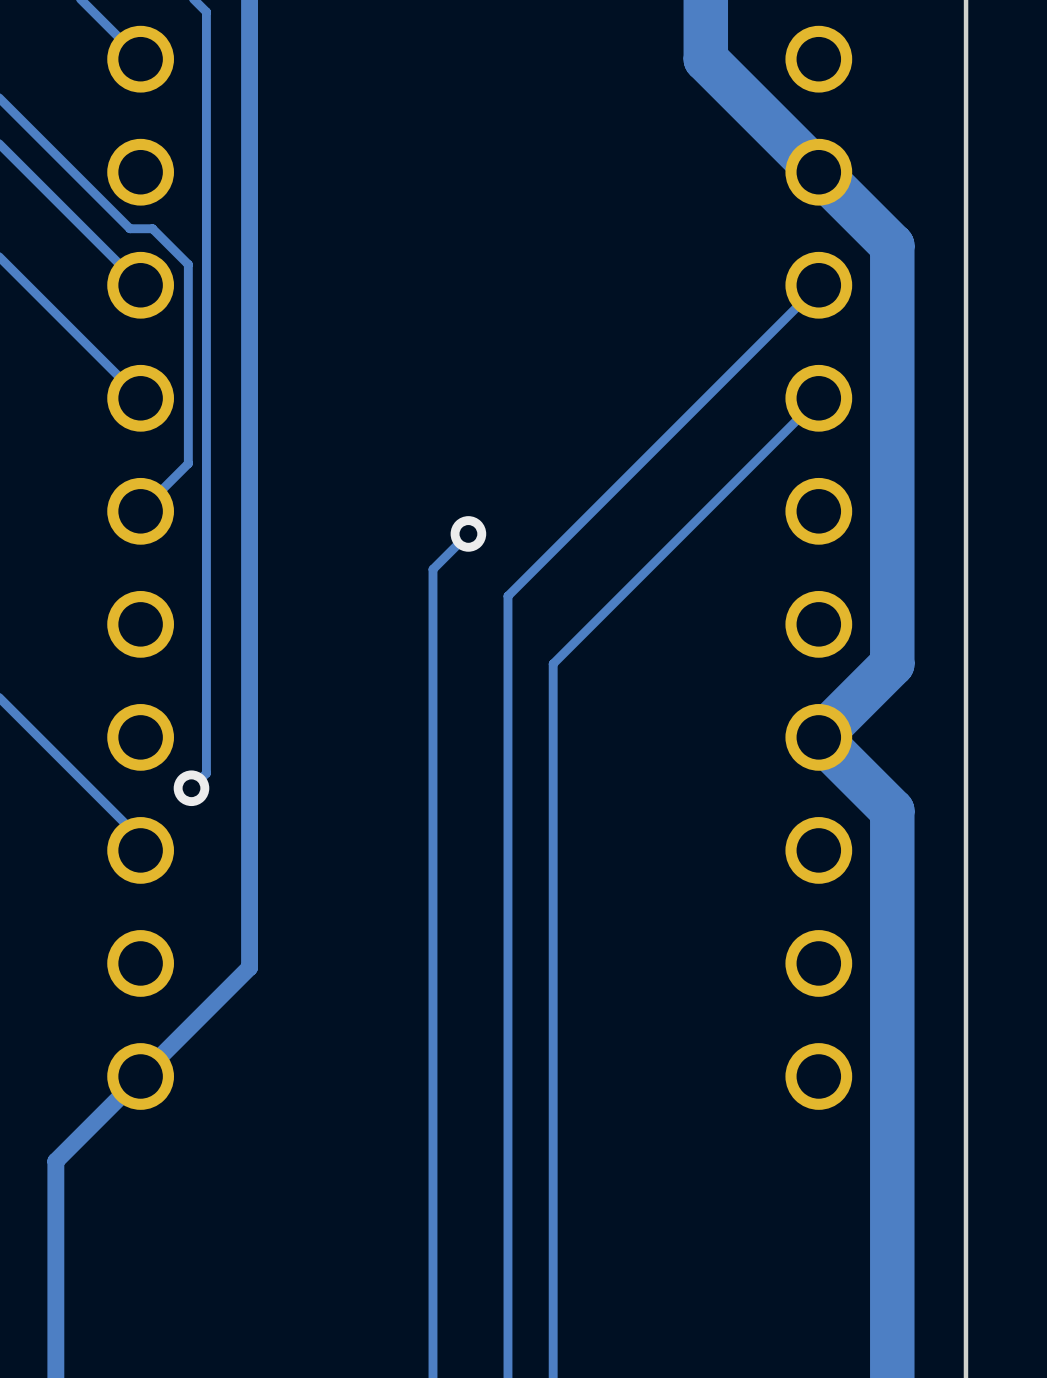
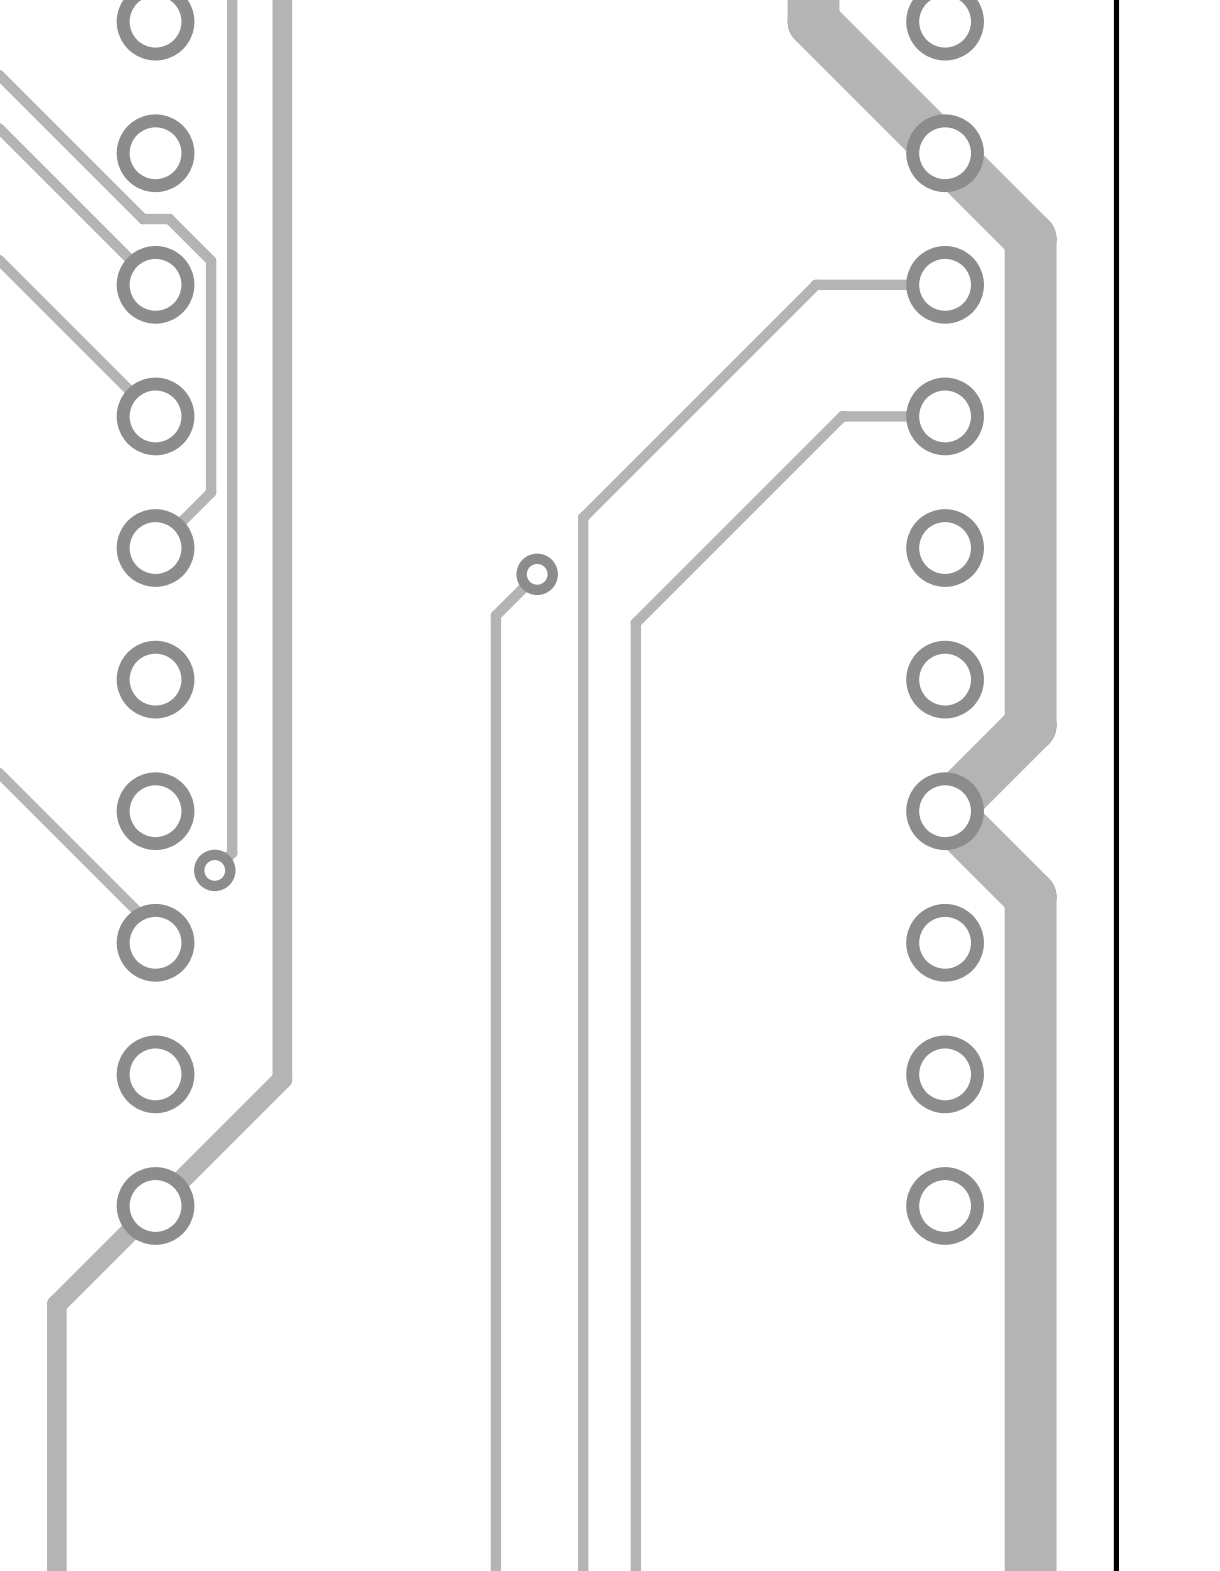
track: (818, 285) (507, 596) -> (945, 284) (816, 284) (583, 517) (583, 646)
track: (818, 398) (553, 663) -> (945, 416) (842, 416) (635, 623) (635, 725)

